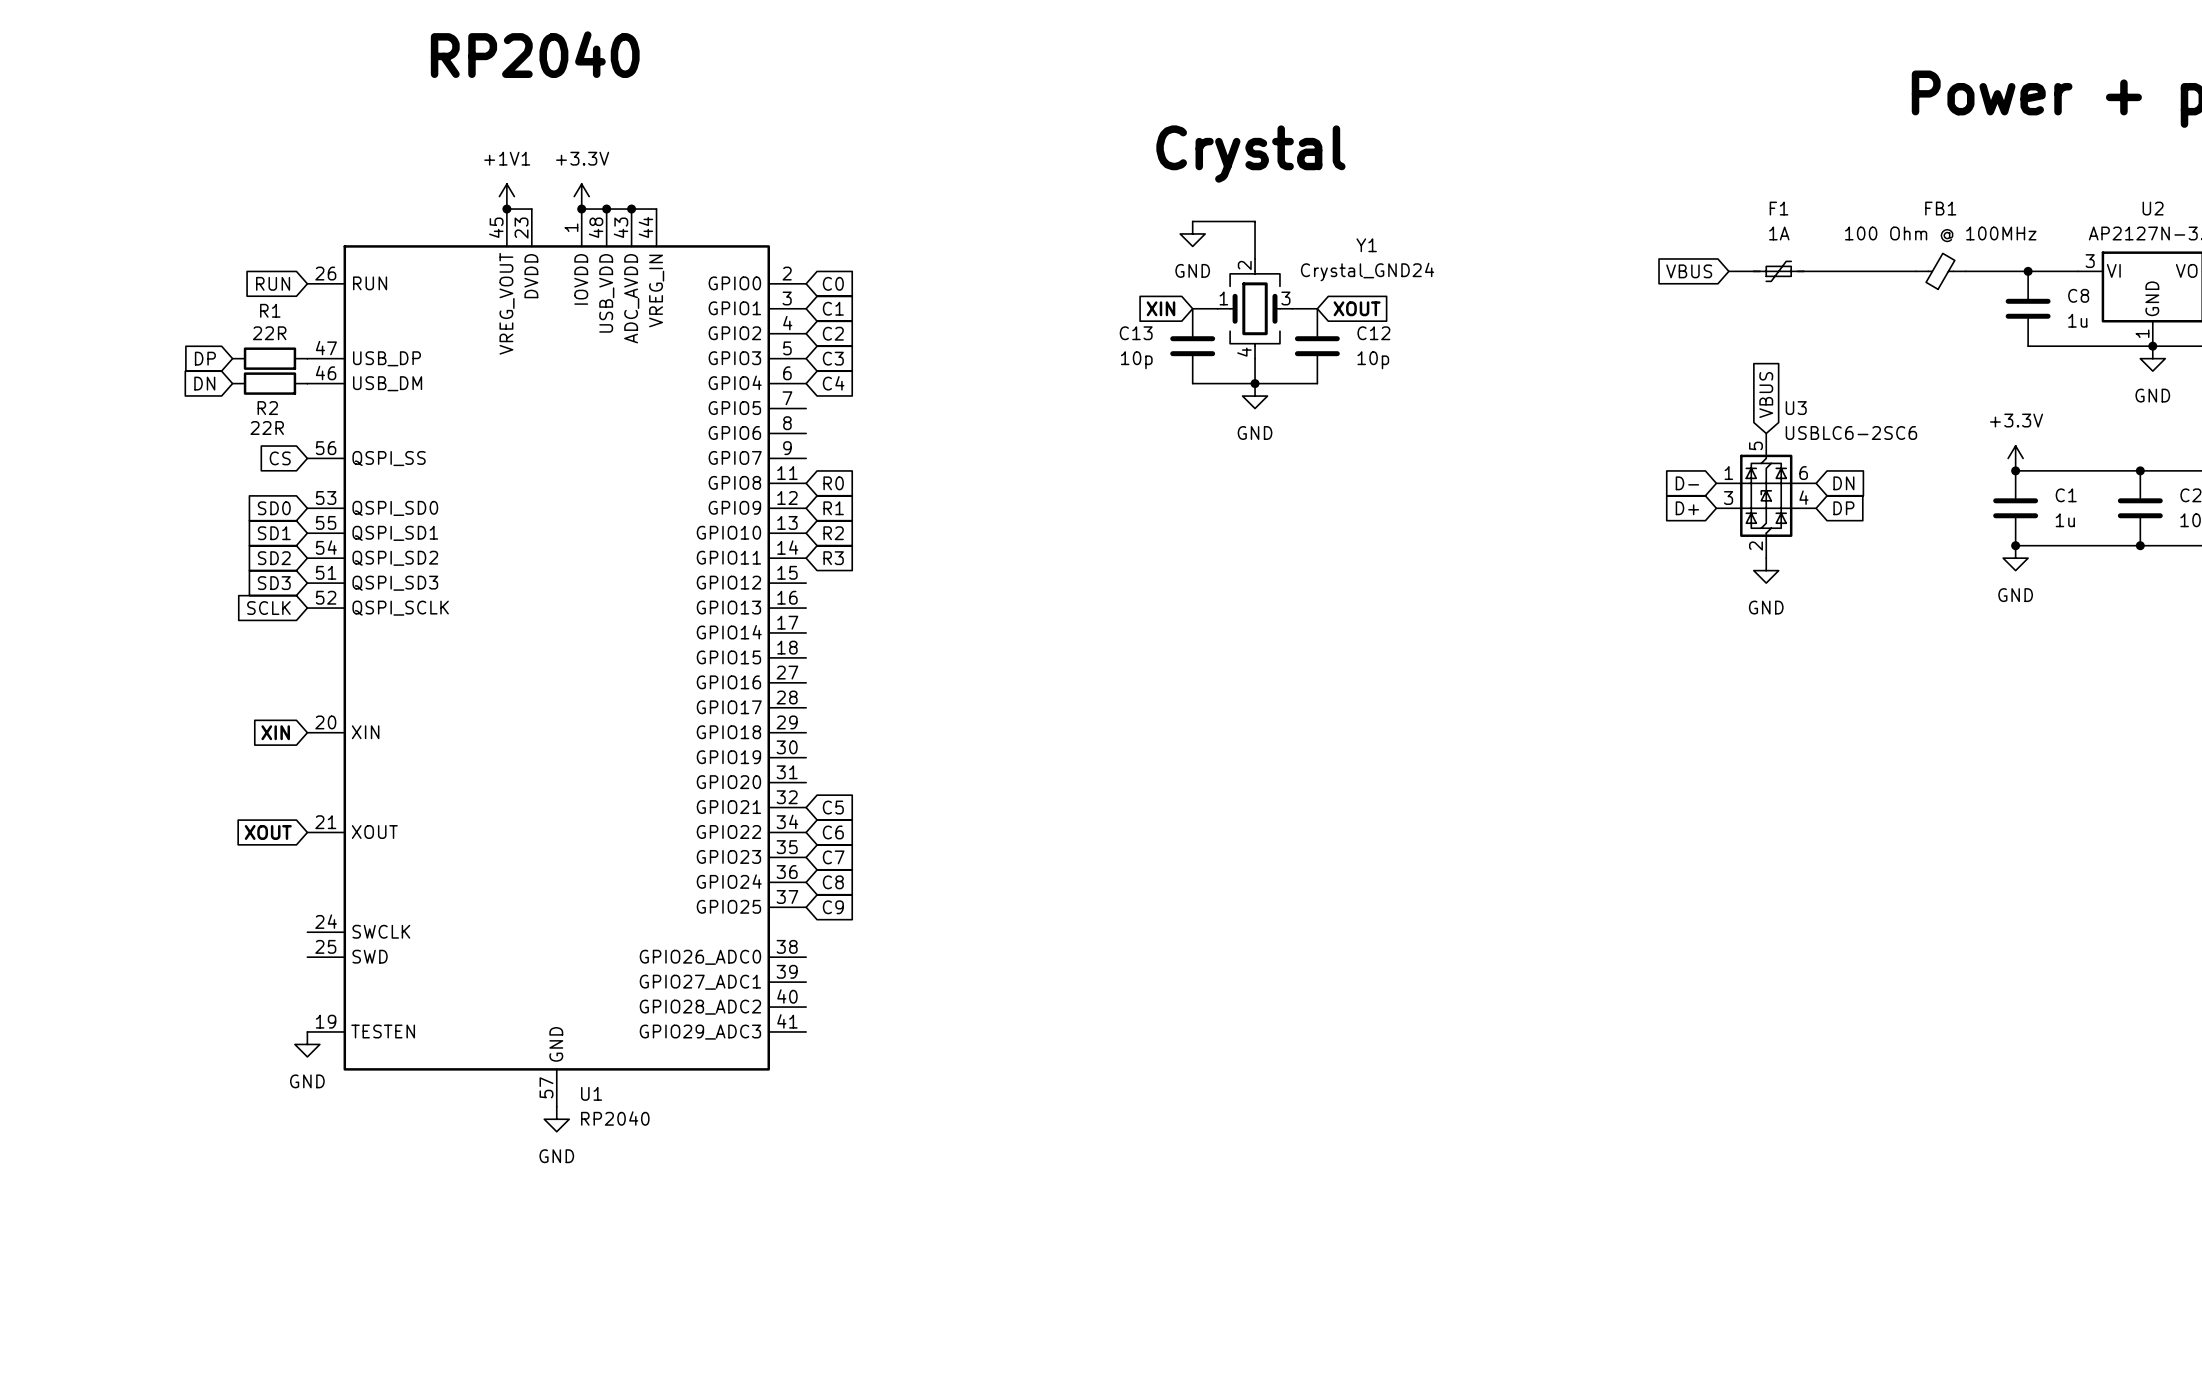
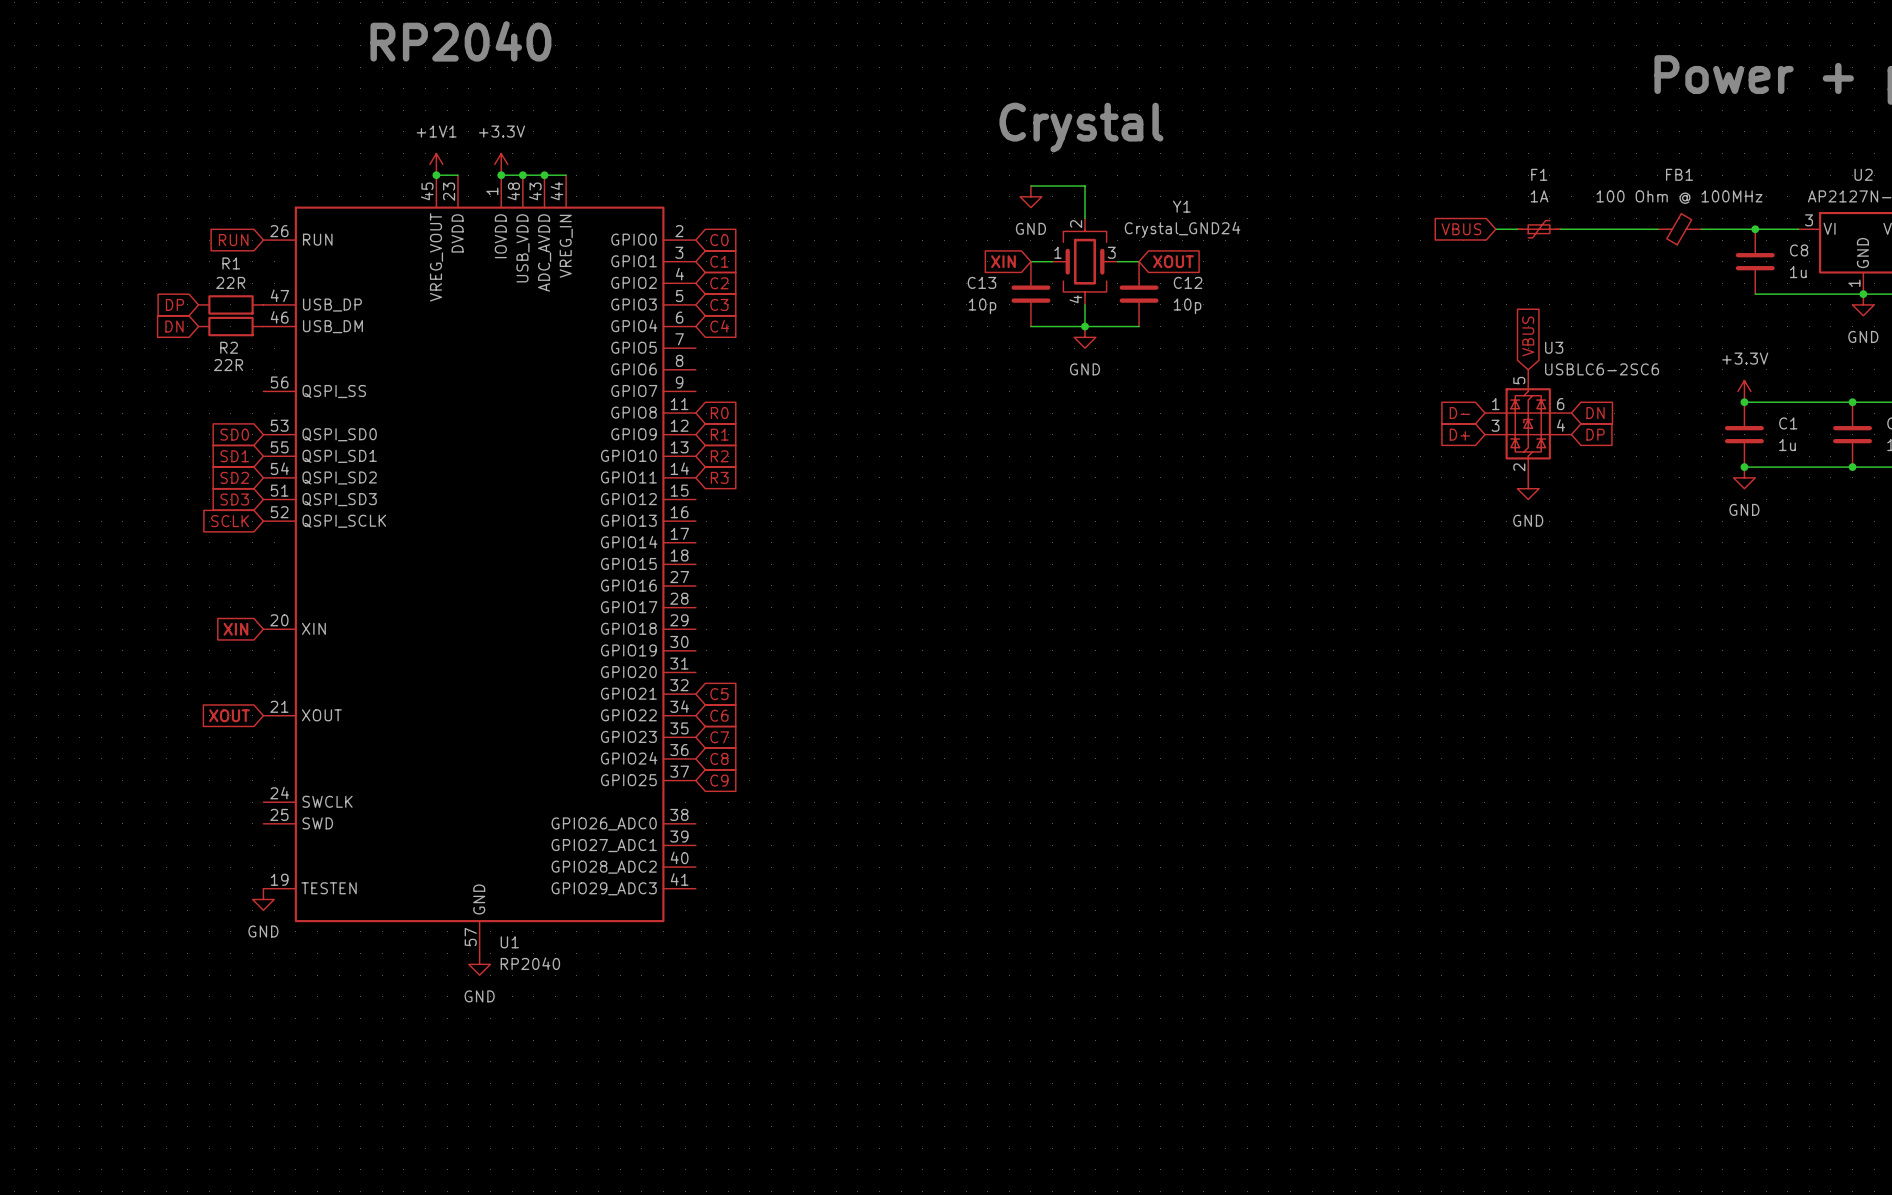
global label: CS (280, 458) -> none

